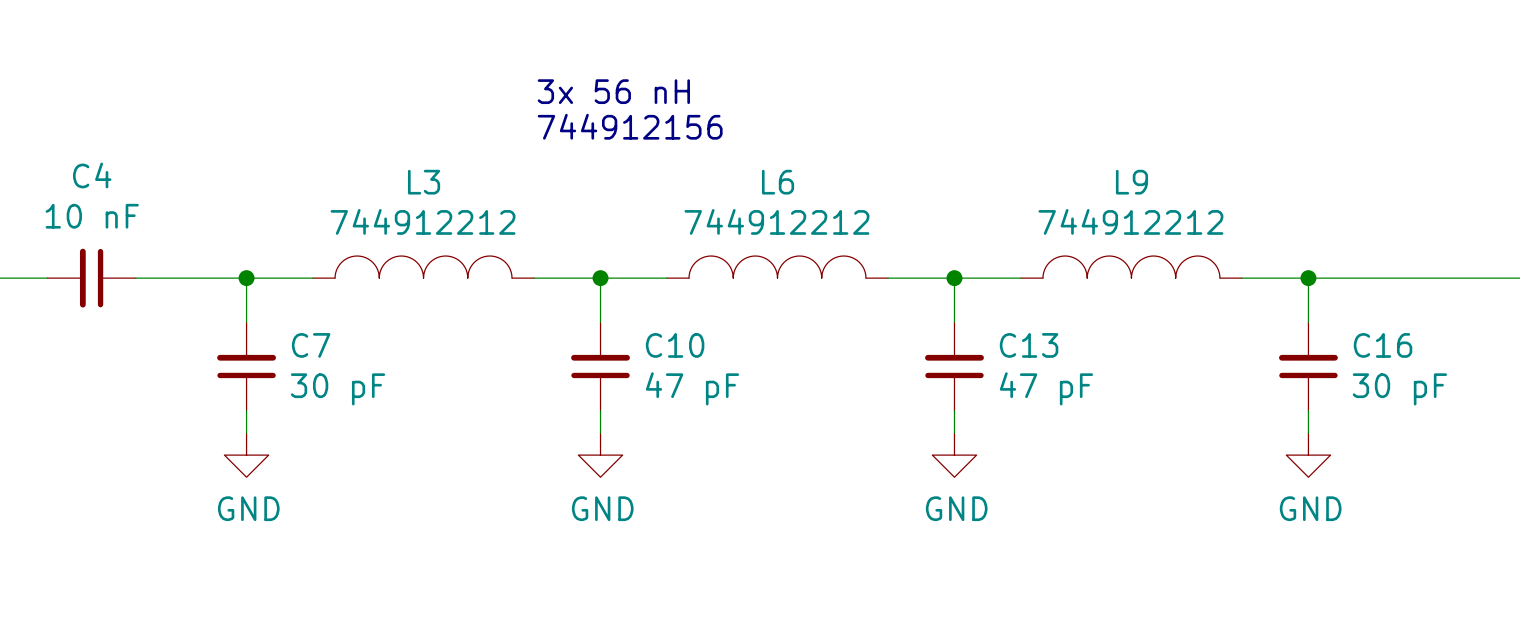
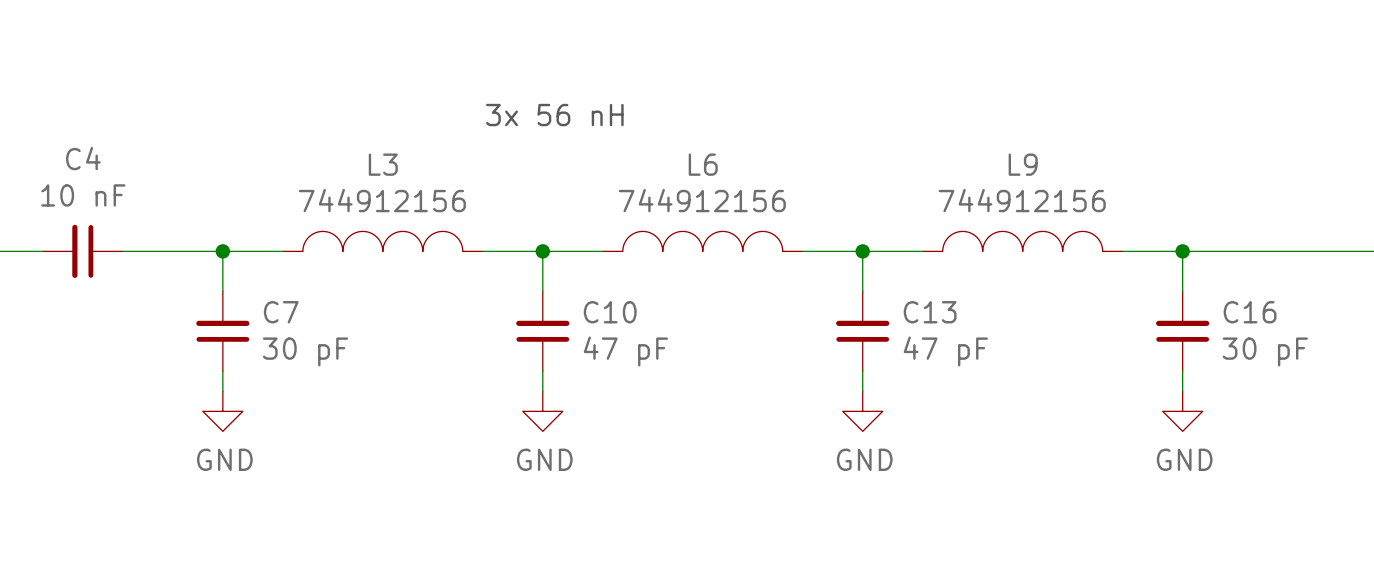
text: 3x 56 nH (613, 91) -> none
text: 744912156 (630, 126) -> 3x 56 nH (554, 115)
L3 value: 744912212 (423, 221) -> 744912156 (382, 200)
L6 value: 744912212 (776, 221) -> 744912156 (702, 200)
L9 value: 744912212 (1130, 221) -> 744912156 (1022, 200)

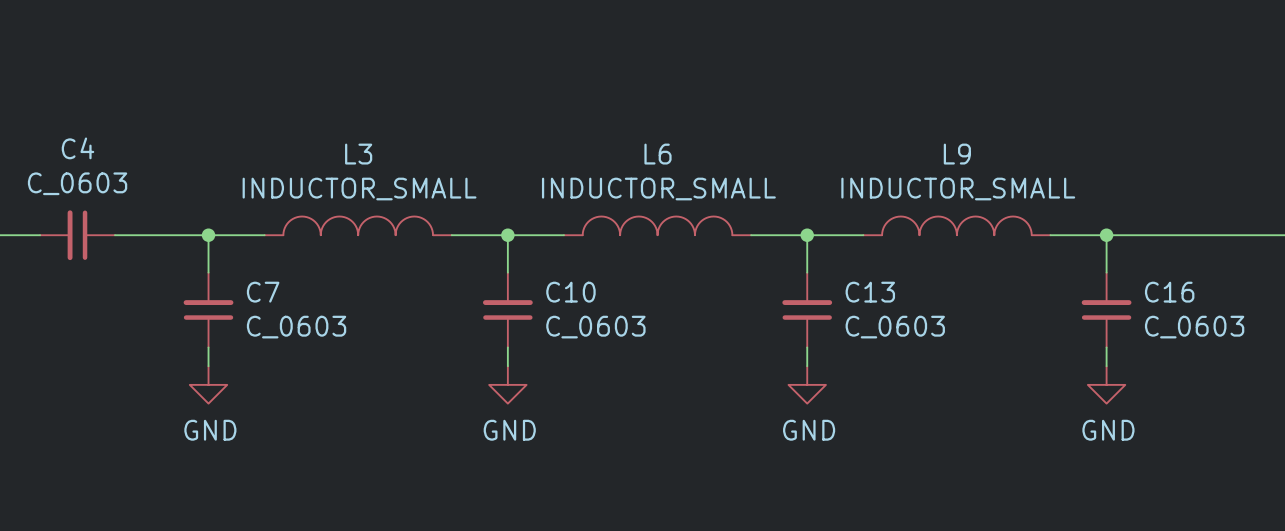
text: 3x 56 nH (554, 115) -> none
C4 value: 10 nF (83, 195) -> C_0603 (77, 183)
L3 value: 744912156 (382, 200) -> INDUCTOR_SMALL (359, 189)
L6 value: 744912156 (702, 200) -> INDUCTOR_SMALL (658, 189)
L9 value: 744912156 (1022, 200) -> INDUCTOR_SMALL (958, 189)
C7 value: 30 pF (305, 351) -> C_0603 (296, 327)
C10 value: 47 pF (625, 351) -> C_0603 (595, 327)
C13 value: 47 pF (945, 351) -> C_0603 (895, 327)
C16 value: 30 pF (1265, 351) -> C_0603 (1194, 327)

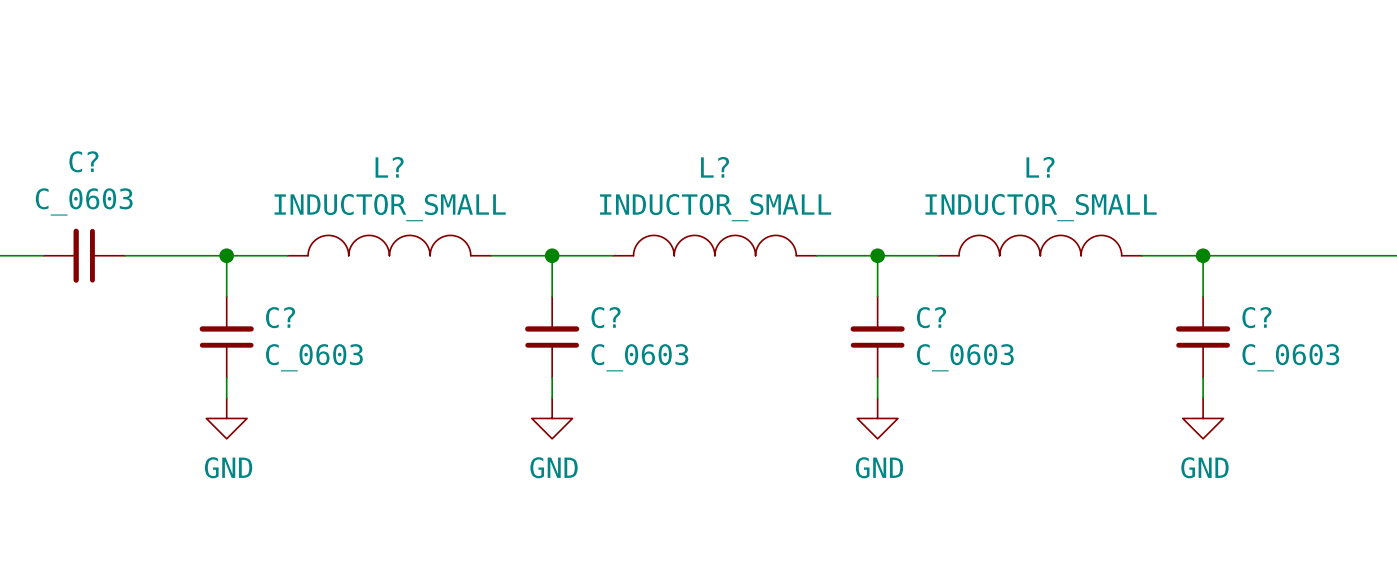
C4 name: C4 (77, 148) -> C? (83, 161)
L3 name: L3 (358, 154) -> L? (389, 167)
L6 name: L6 (658, 154) -> L? (715, 167)
L9 name: L9 (957, 154) -> L? (1040, 167)
C7 name: C7 (263, 292) -> C? (280, 317)
C10 name: C10 (570, 292) -> C? (606, 317)
C13 name: C13 (870, 292) -> C? (931, 317)
C16 name: C16 (1169, 292) -> C? (1256, 317)

